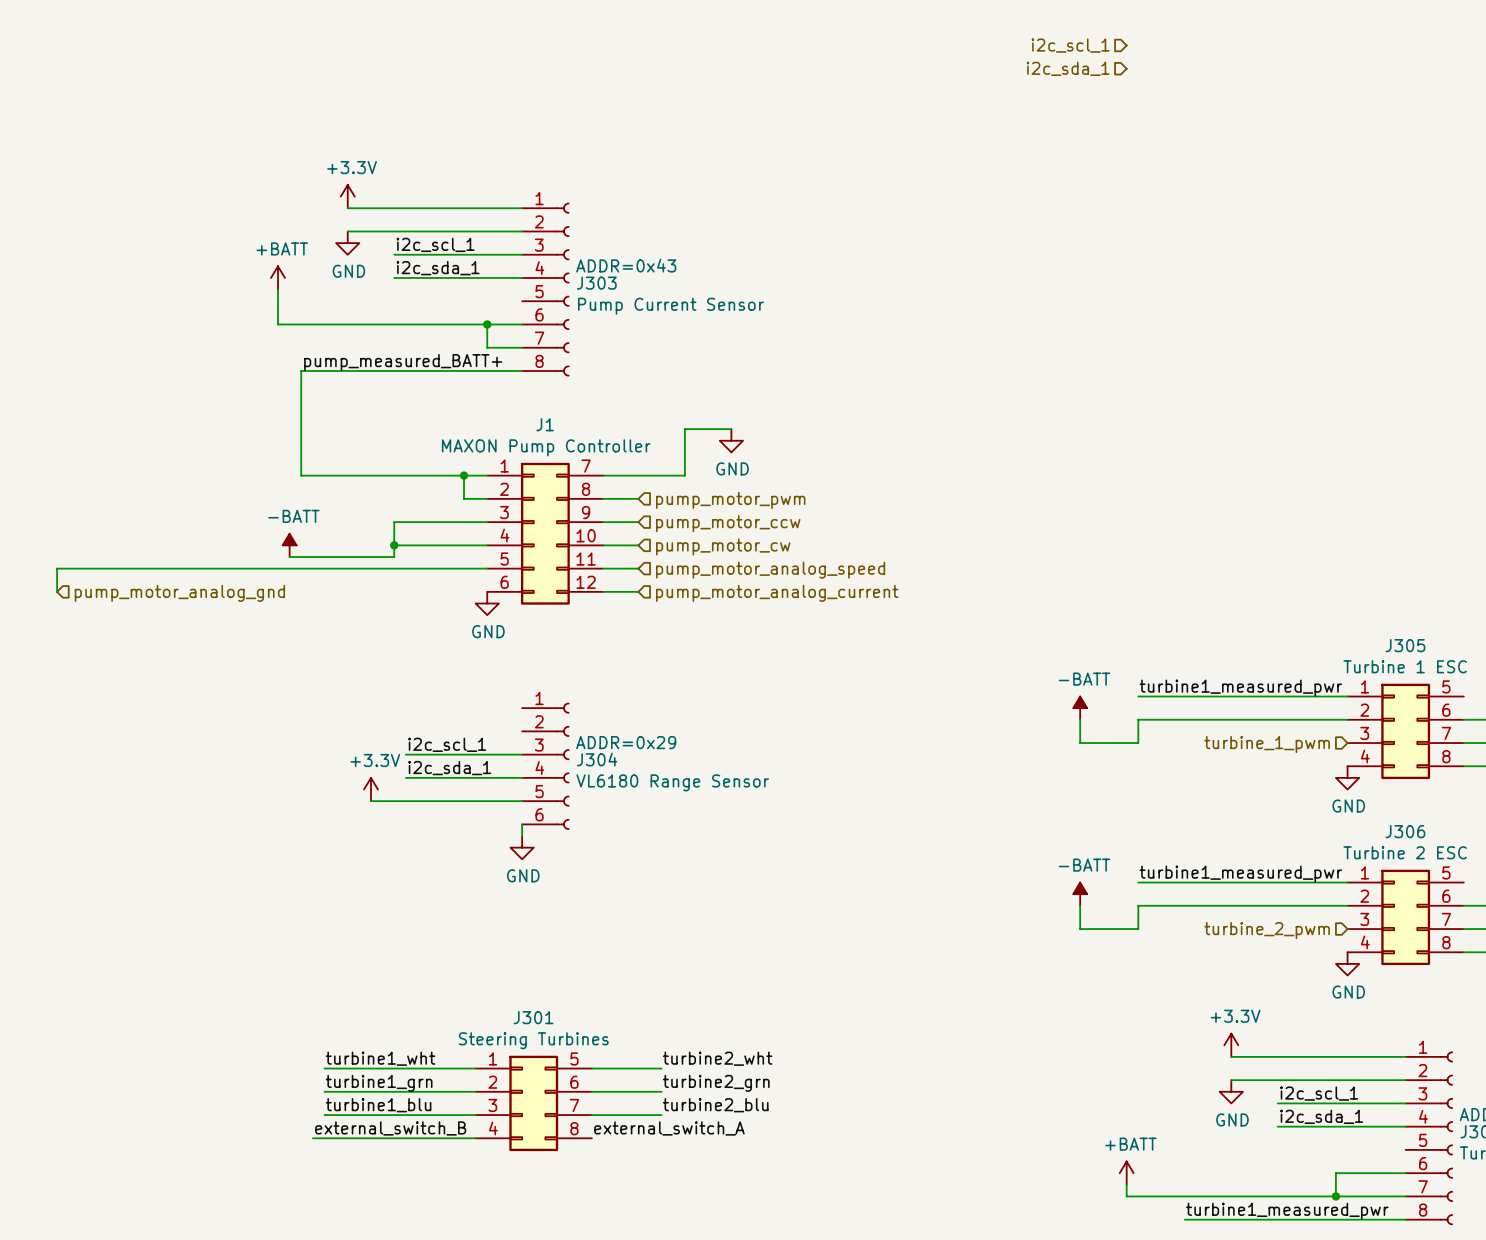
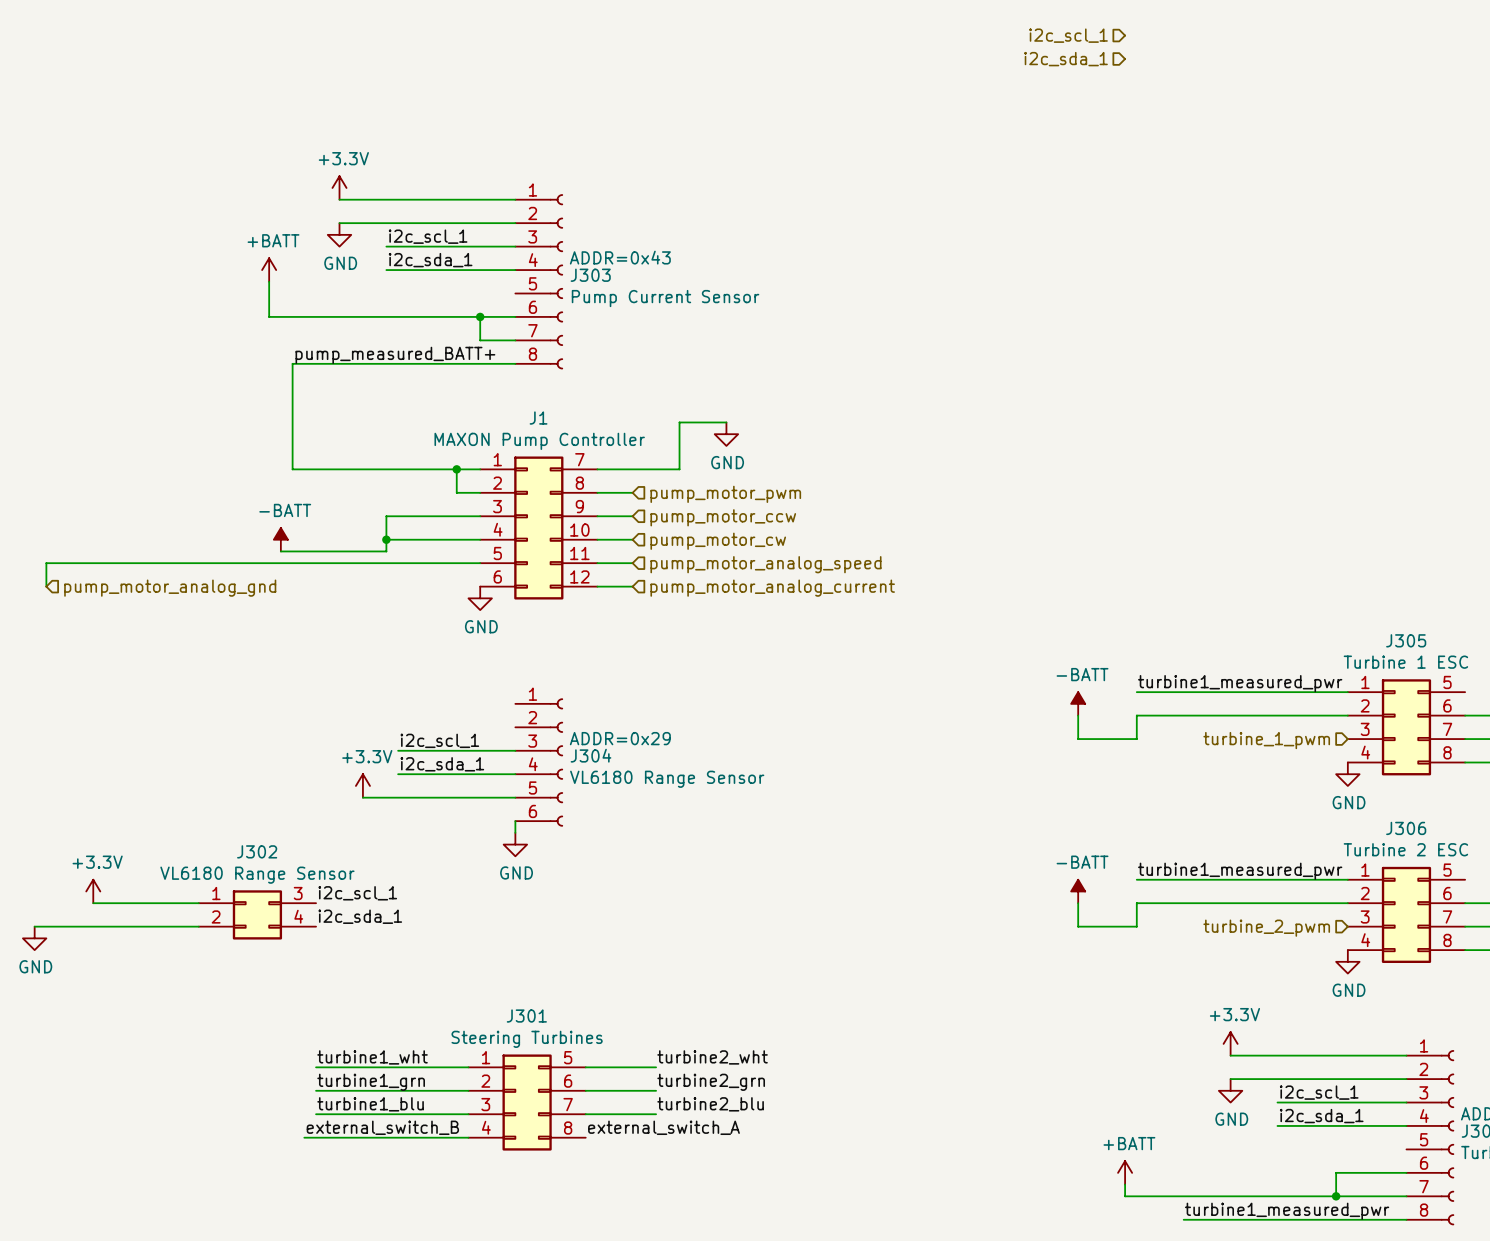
power symbol: none -> +3.3V (93, 891)
label: none -> i2c_scl_1 (357, 893)
wire: none -> (93, 903) (198, 903)
J302: none -> VL6180 Range Sensor (257, 914)
label: none -> i2c_sda_1 (360, 916)
wire: none -> (34, 926) (198, 926)
power symbol: none -> GND (34, 938)

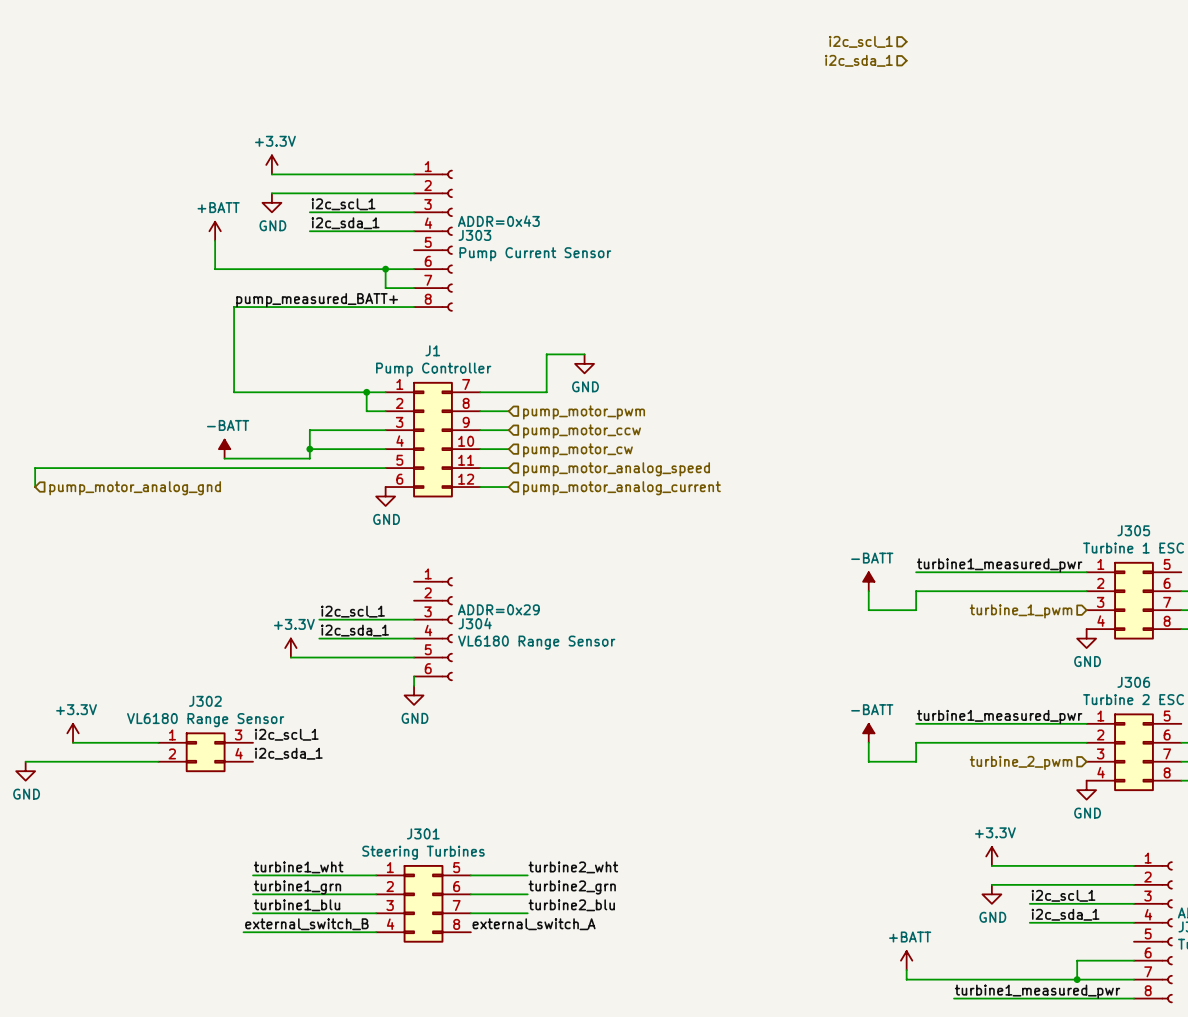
J1 value: MAXON Pump Controller (539, 441) -> Pump Controller (433, 369)

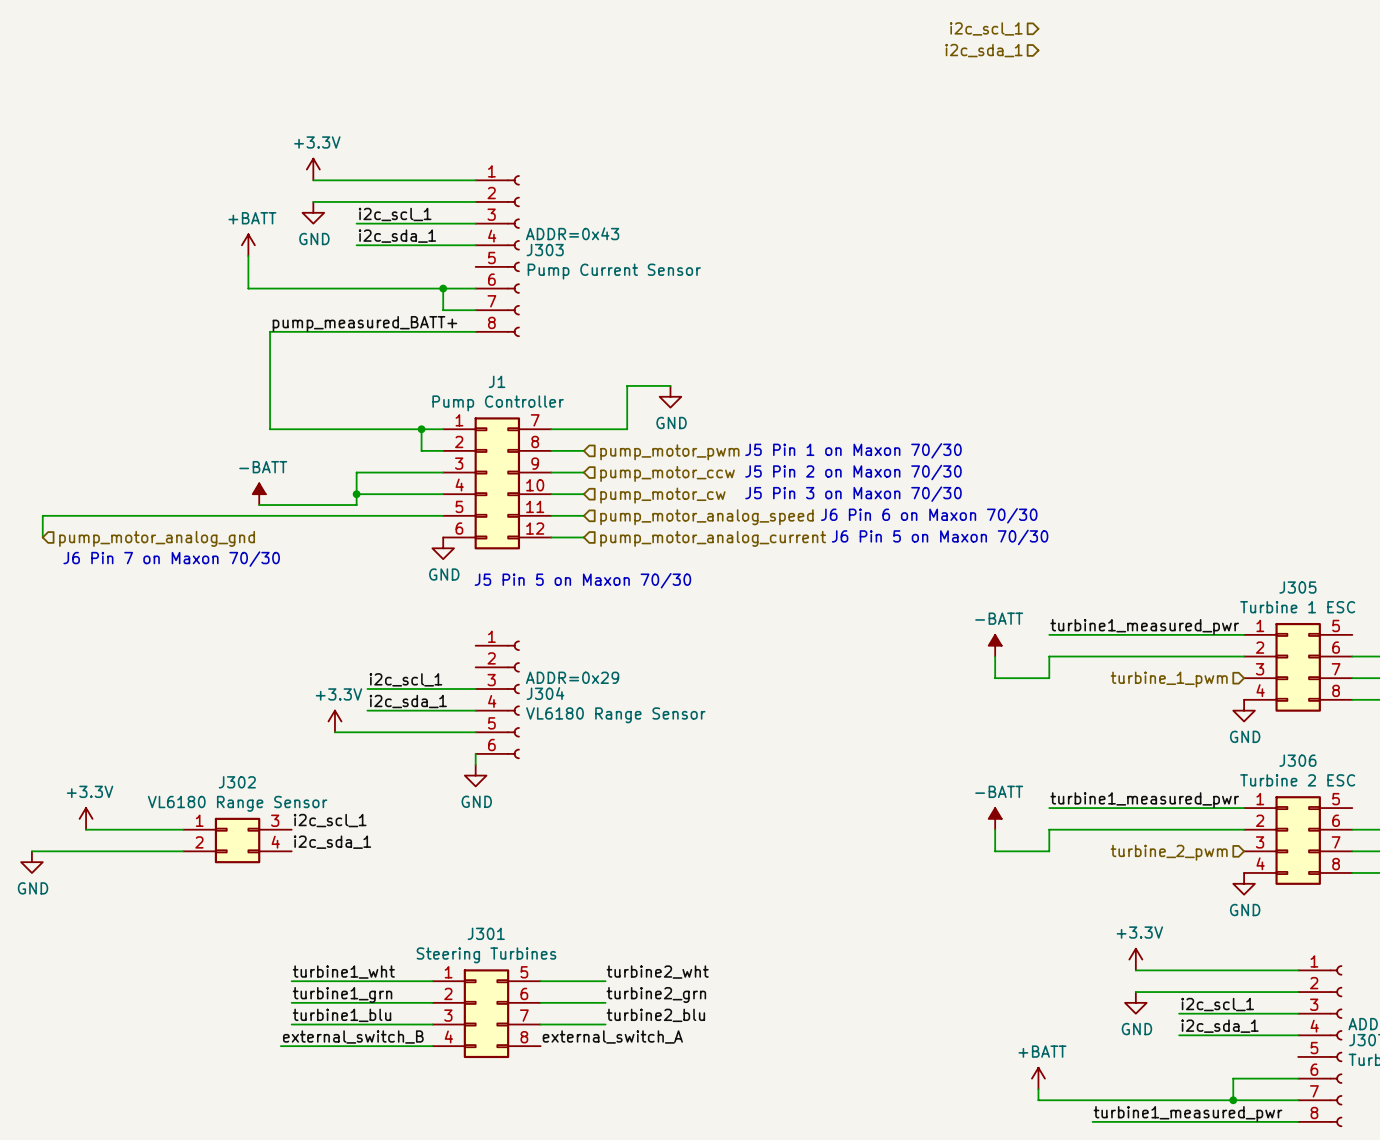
text: none -> J5 Pin 1 on Maxon 70/30 (853, 450)
text: none -> J5 Pin 2 on Maxon 70/30 (853, 472)
text: none -> J5 Pin 3 on Maxon 70/30 (853, 494)
text: none -> J6 Pin 6 on Maxon 70/30 (929, 515)
text: none -> J6 Pin 5 on Maxon 70/30 (940, 537)
text: none -> J6 Pin 7 on Maxon 70/30 (171, 559)
text: none -> J5 Pin 5 on Maxon 70/30 (582, 580)

